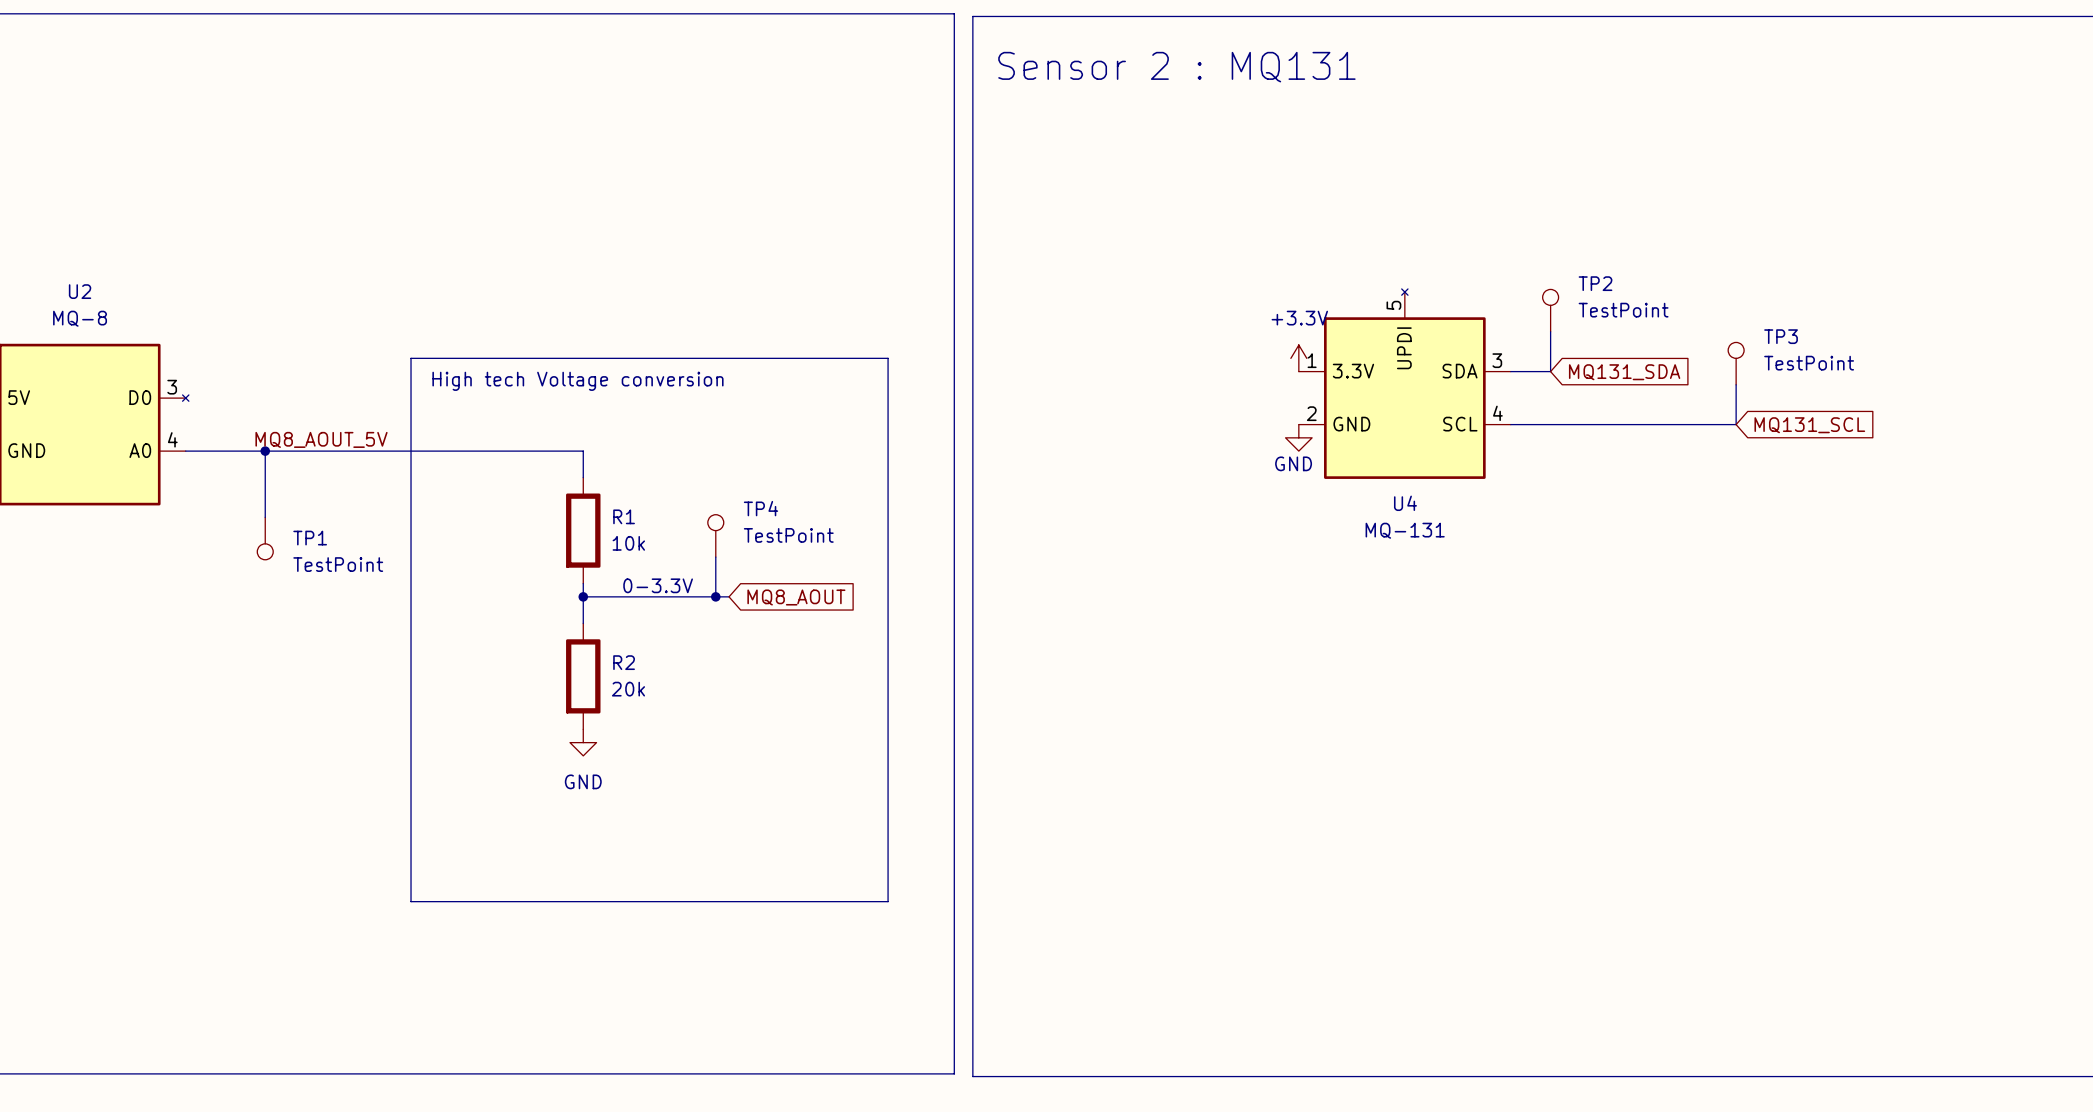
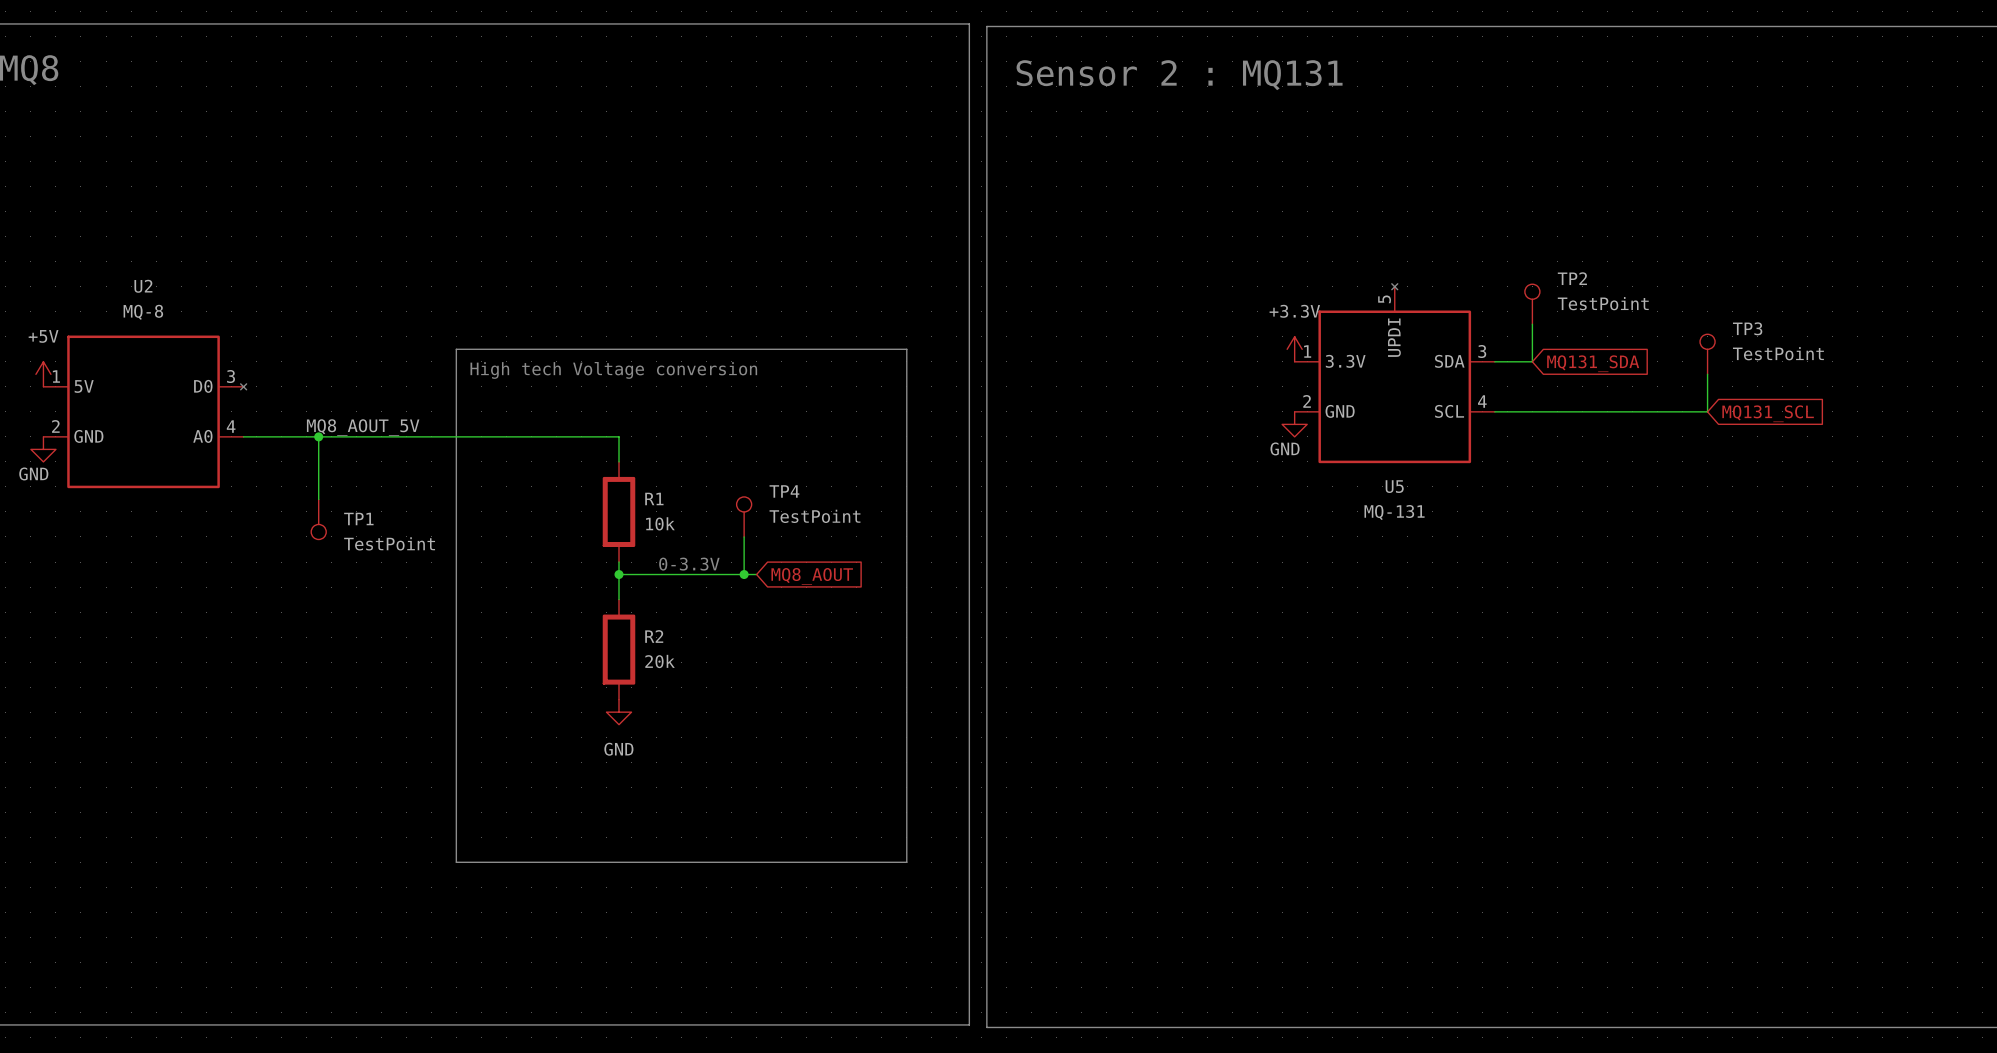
U4 name: U4 (1405, 503) -> U5 (1394, 486)

